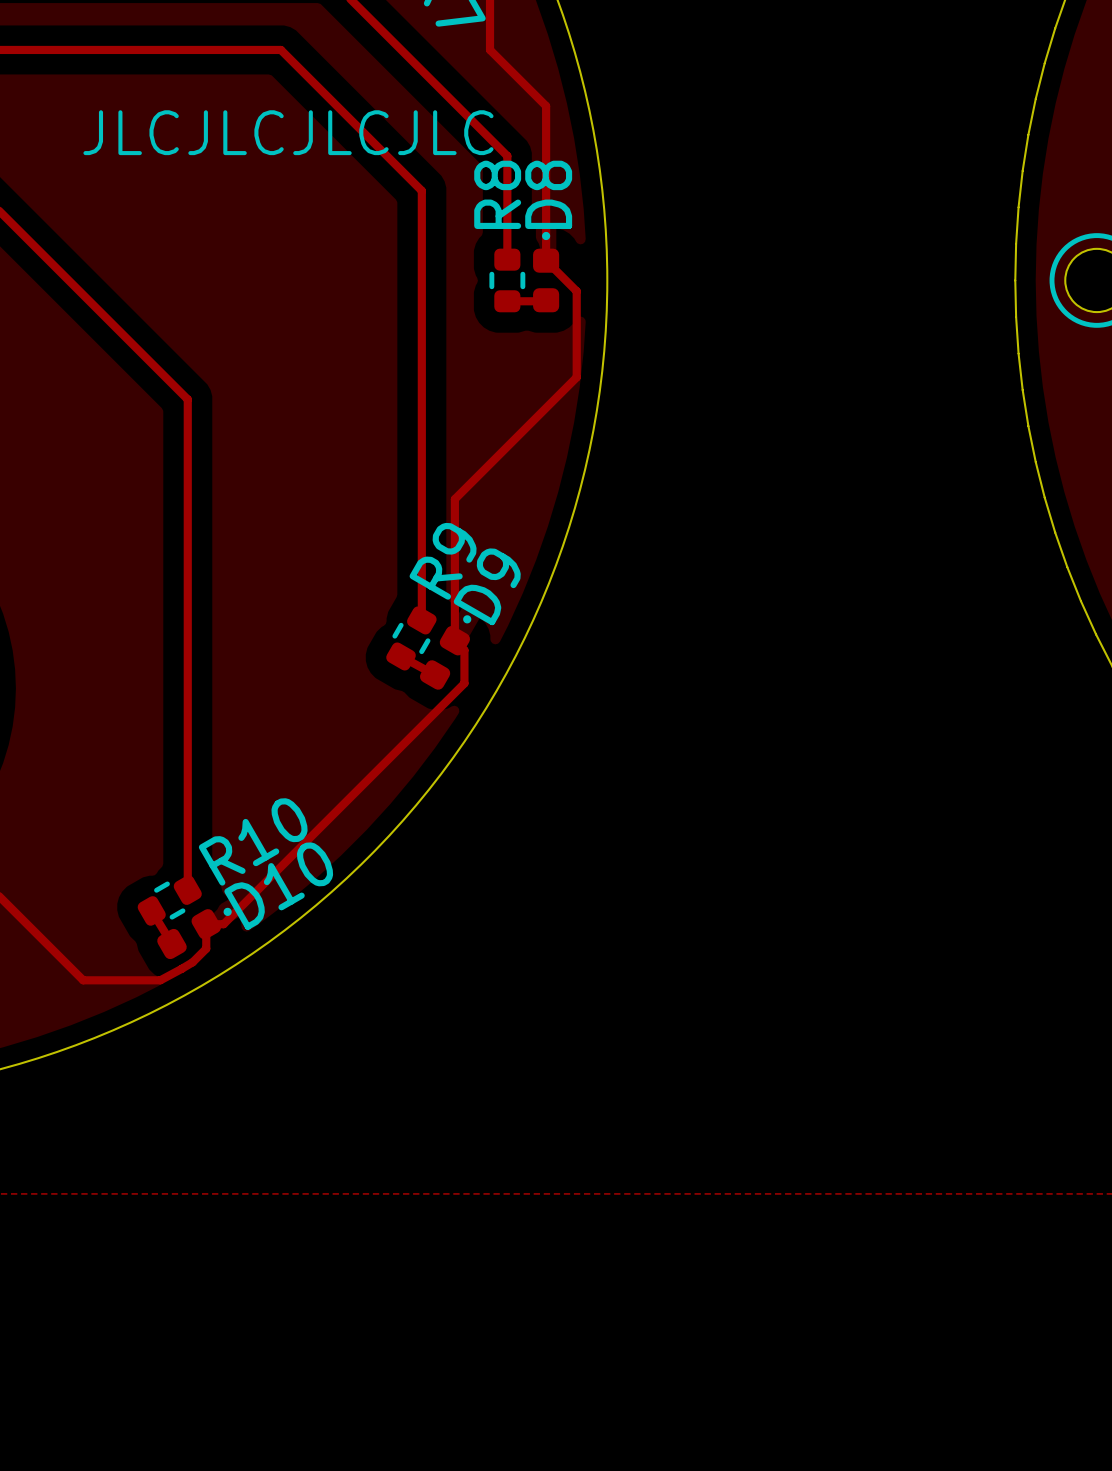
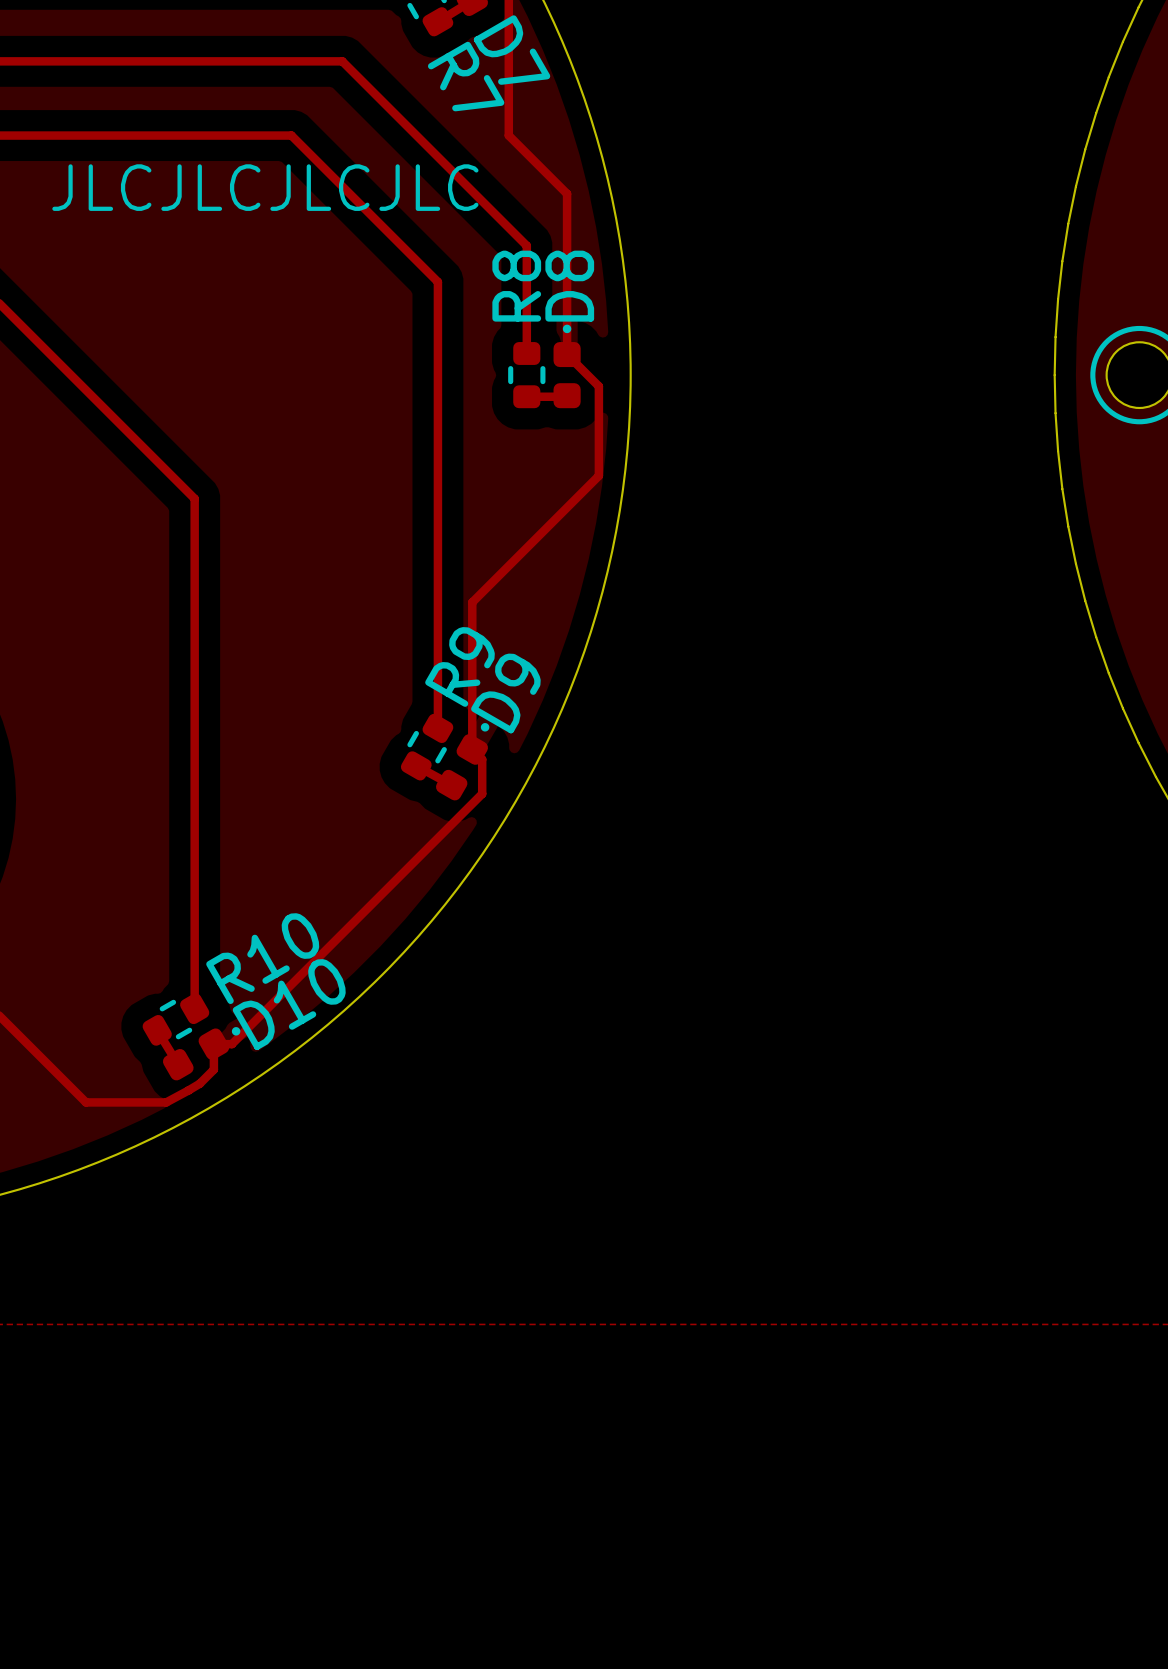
text position: JLCJLCJLCJLC (288, 132) -> JLCJLCJLCJLC (265, 187)

